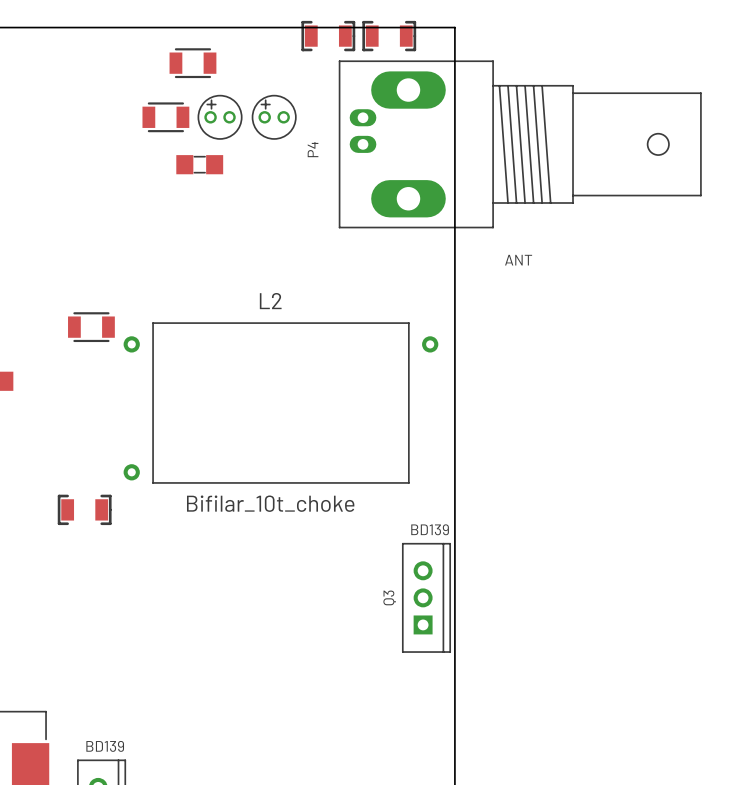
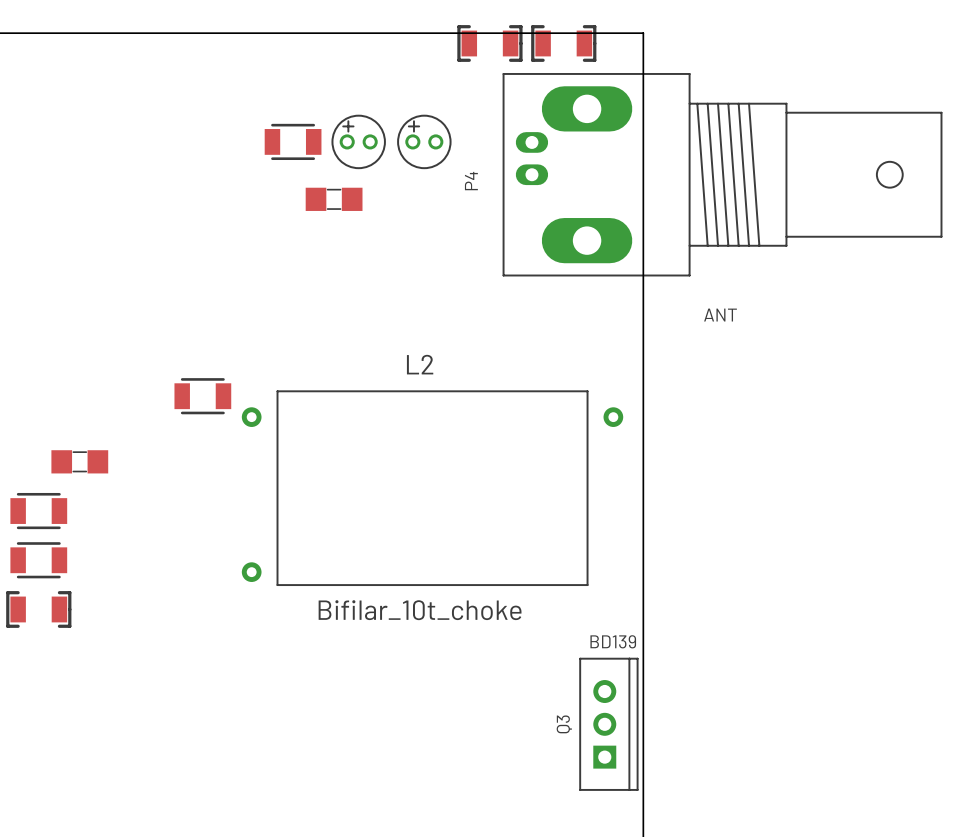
part: (192, 63) -> none
part: (84, 509) -> none

